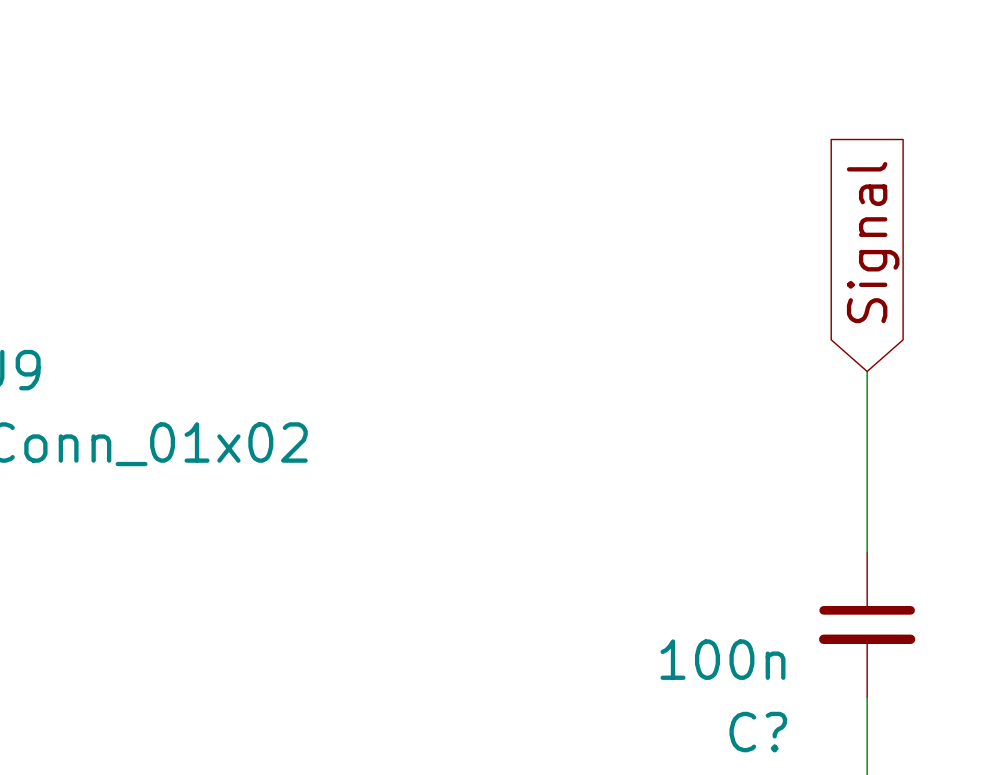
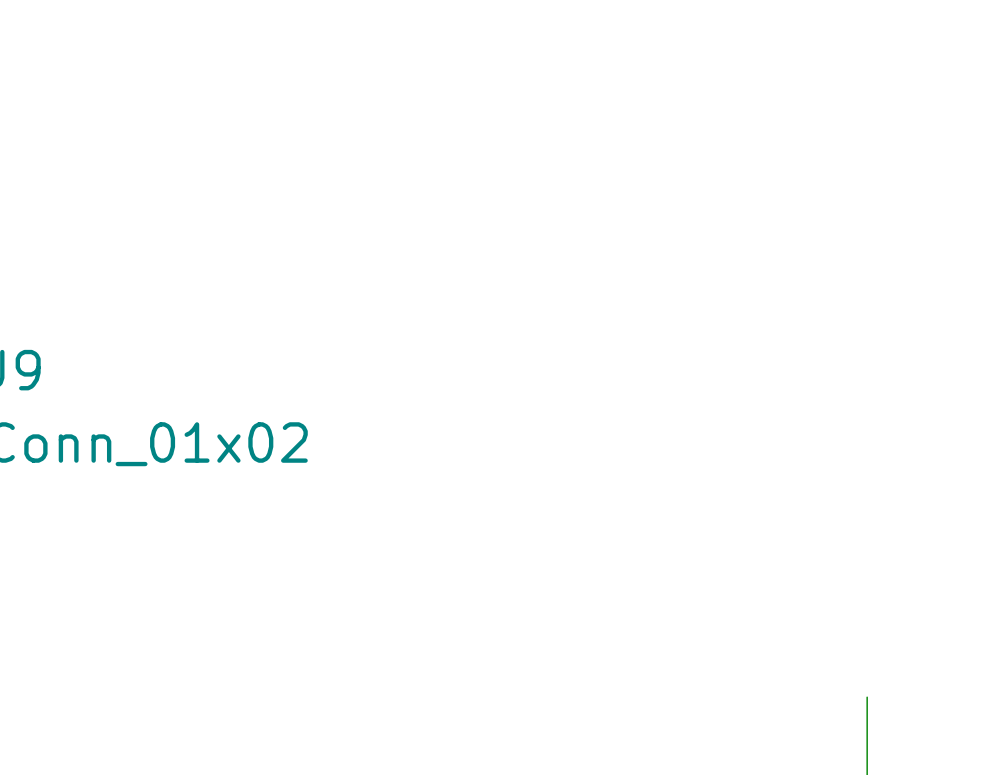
global label: Signal (873, 242) -> none
wire: (867, 371) (867, 552) -> none
C?: 100n (867, 624) -> none

